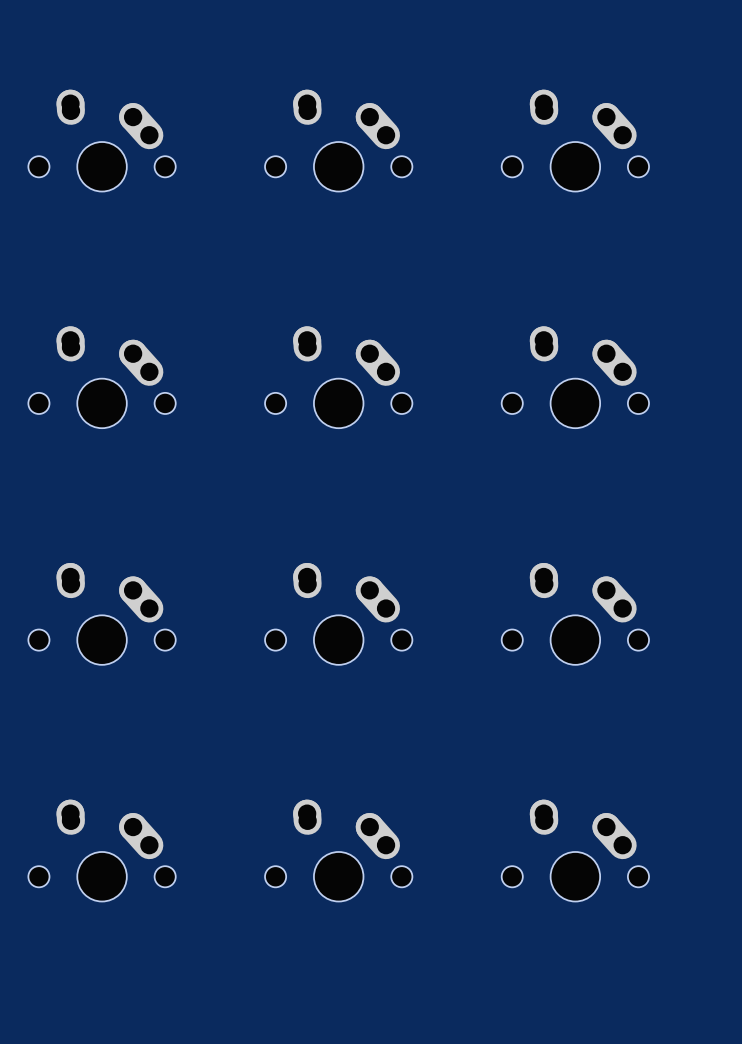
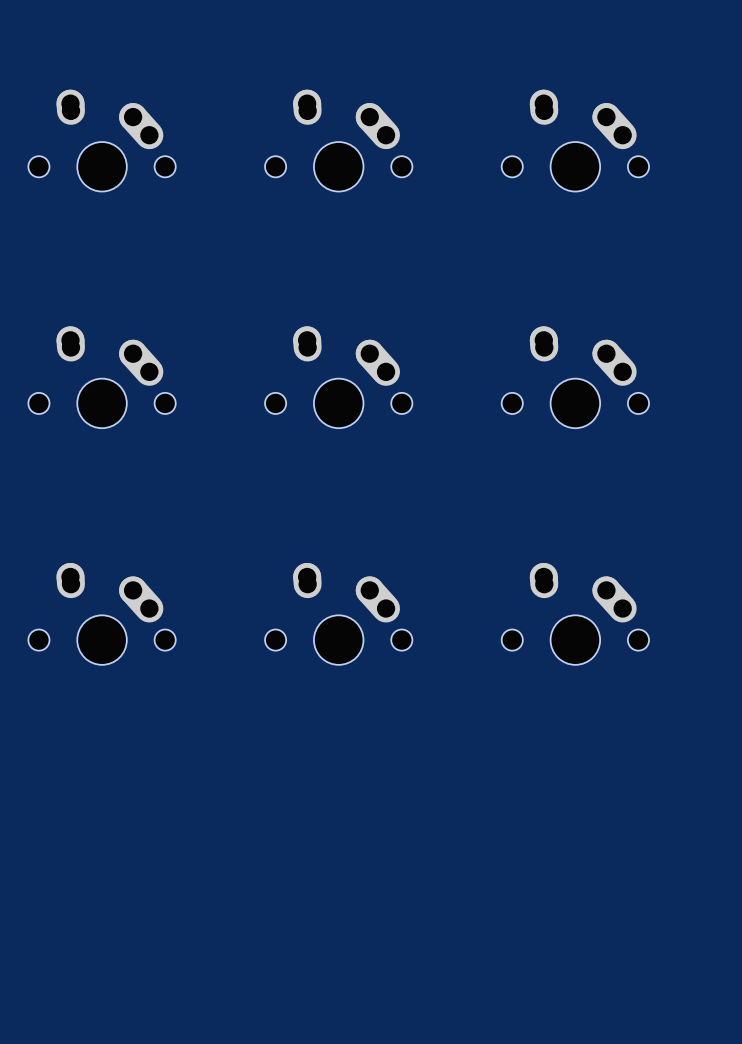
part: (102, 850) -> none
part: (338, 850) -> none
part: (575, 850) -> none

